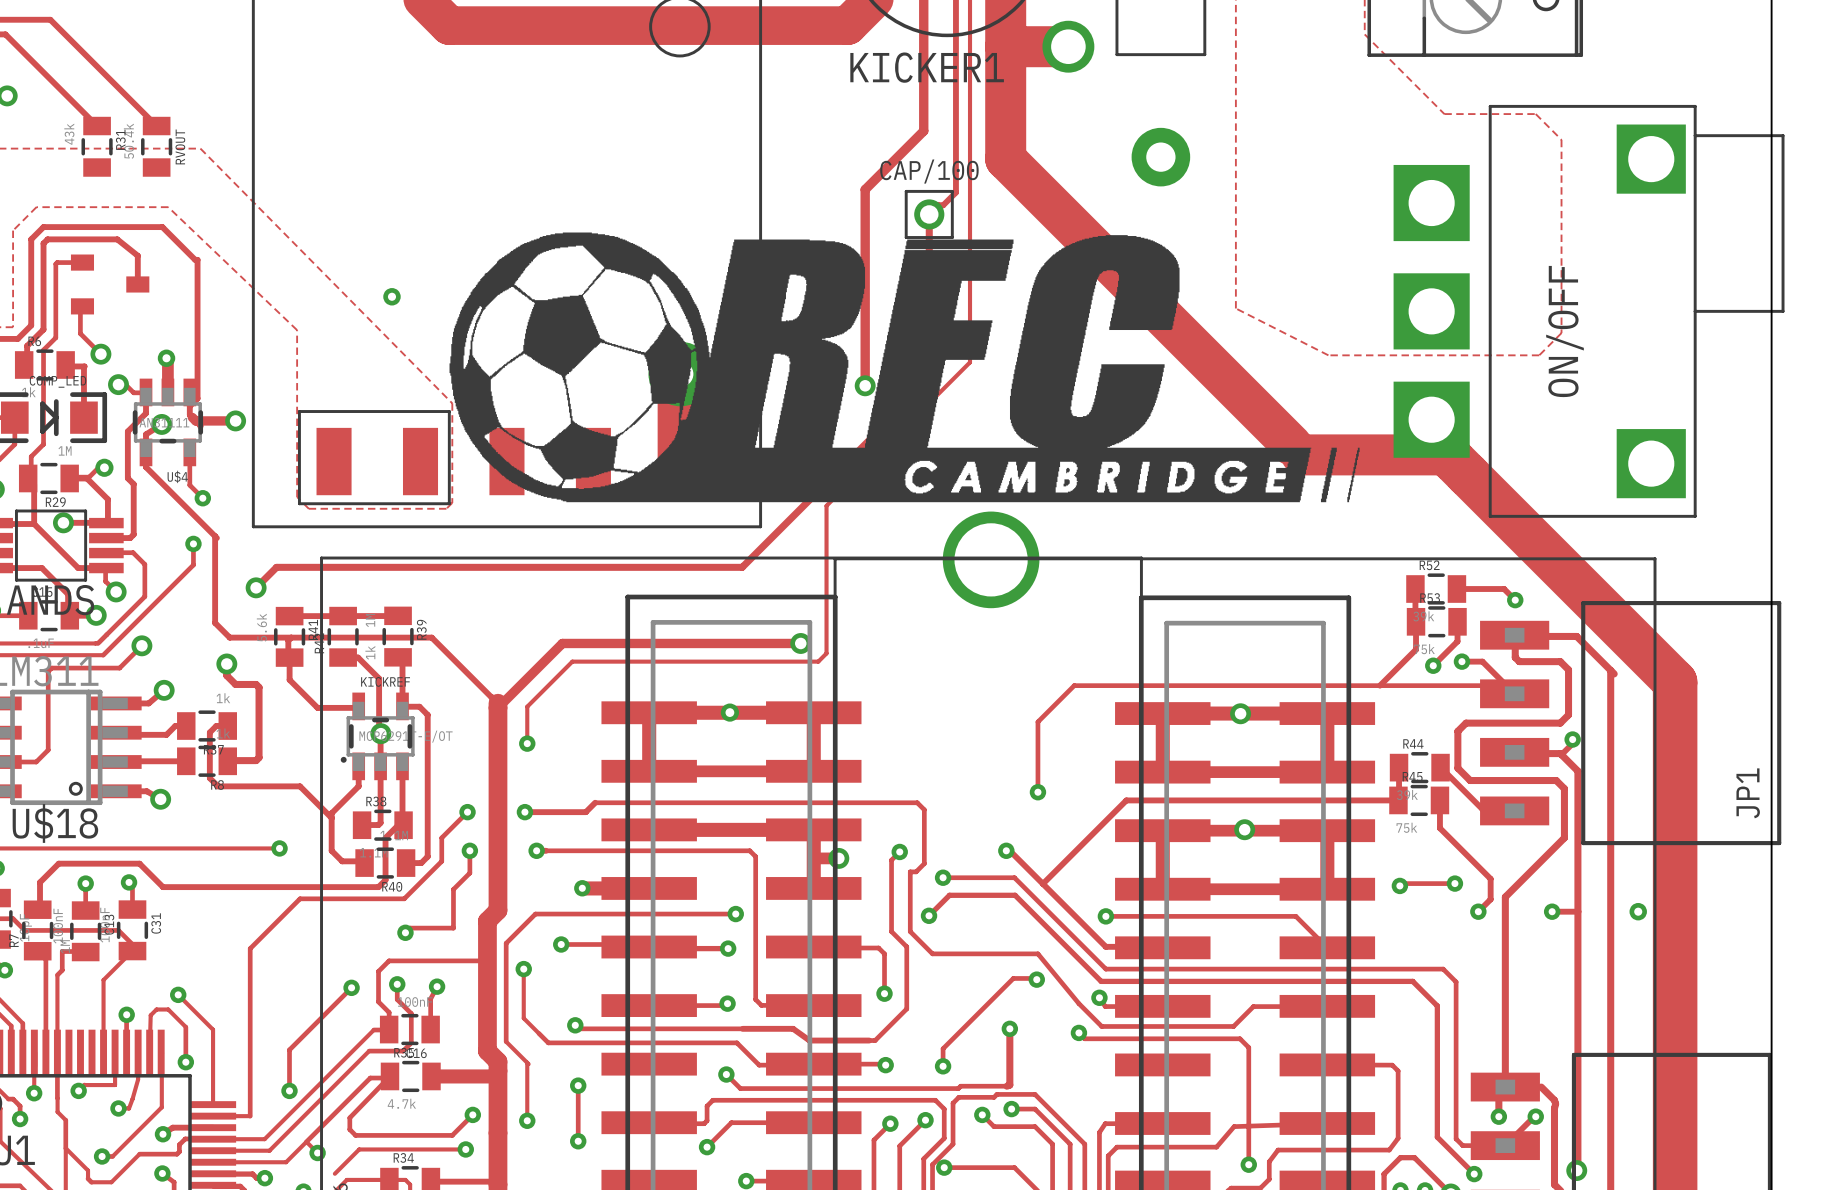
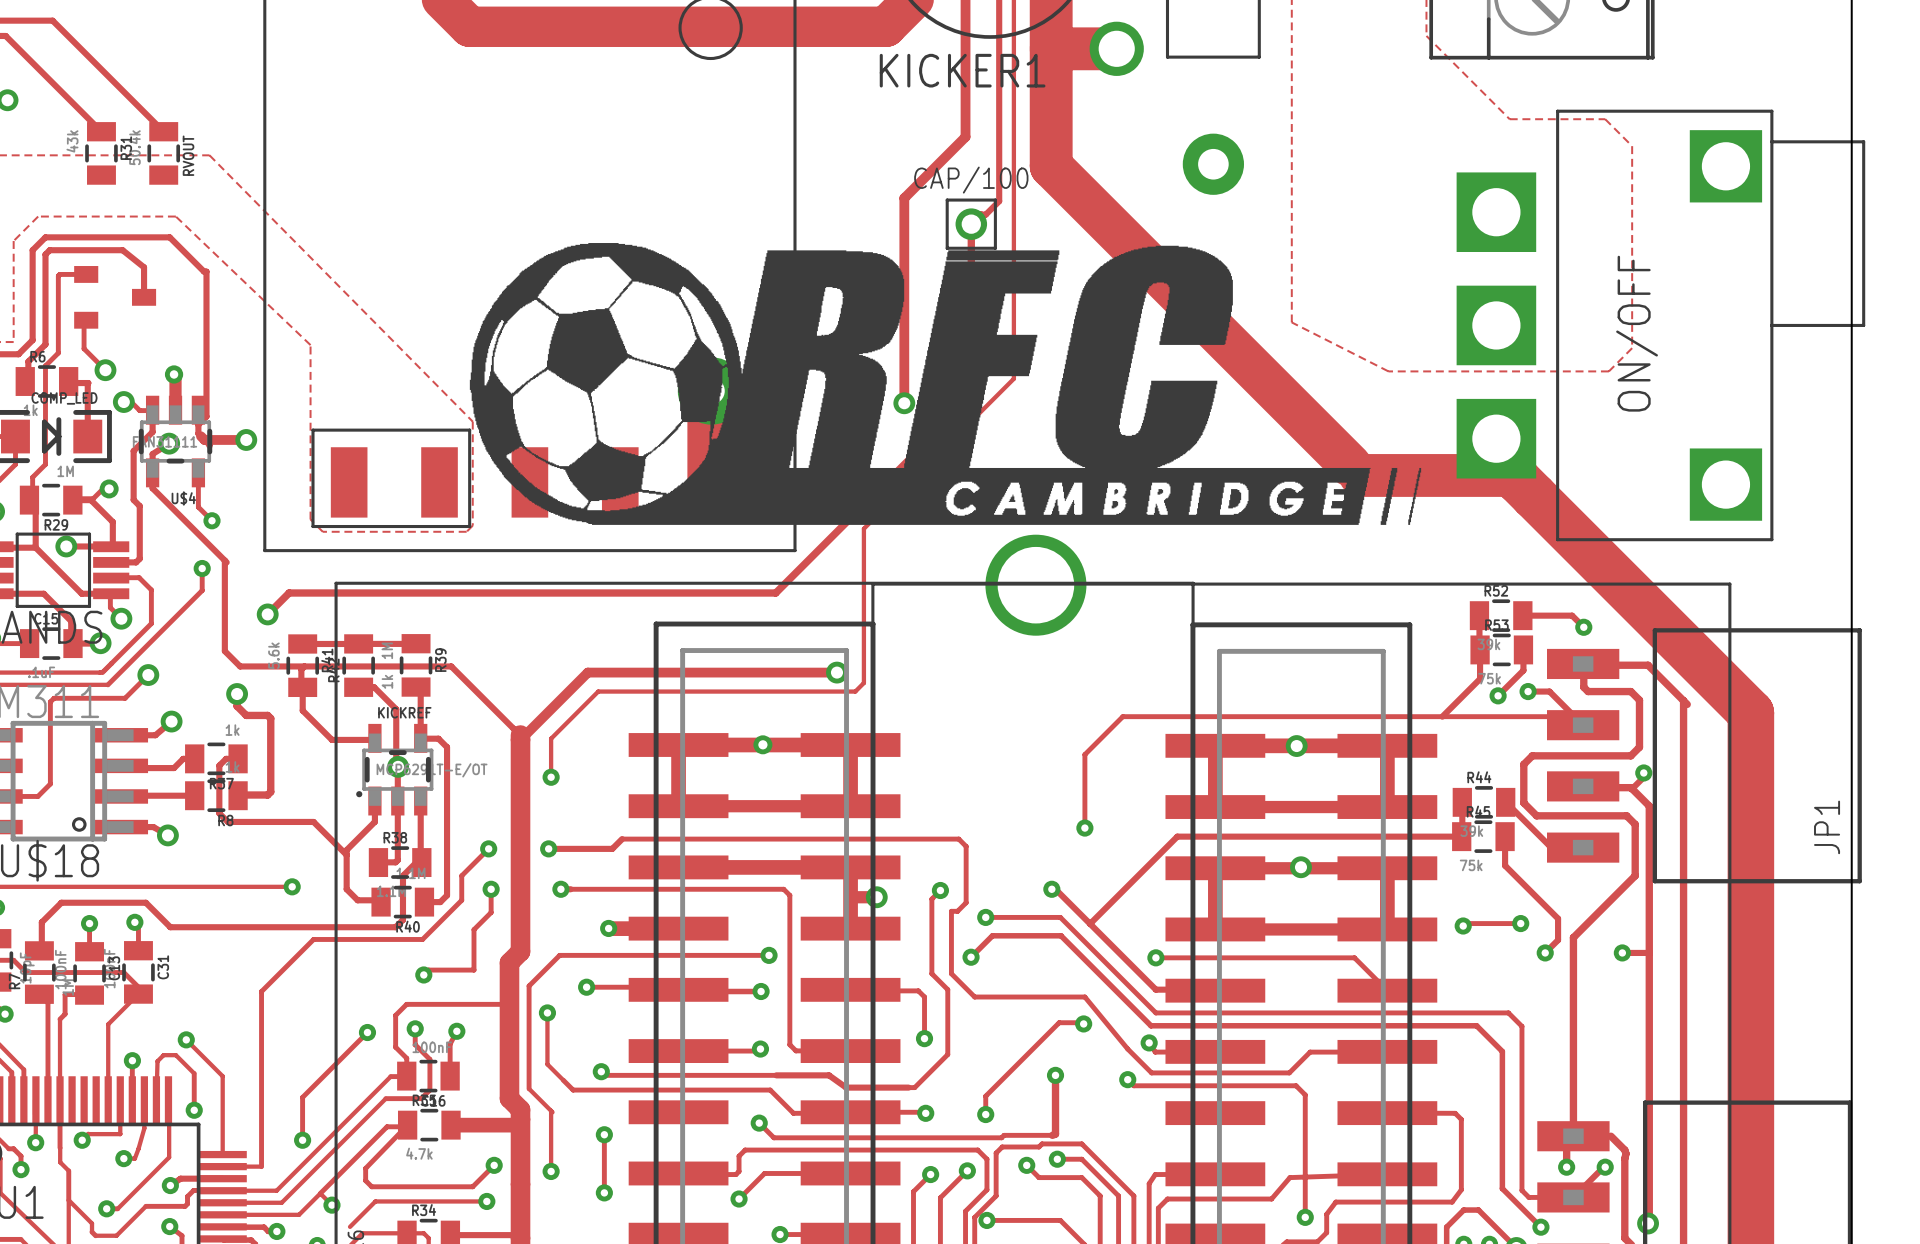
via: (391, 296) -> none
via: (1638, 911) -> none

